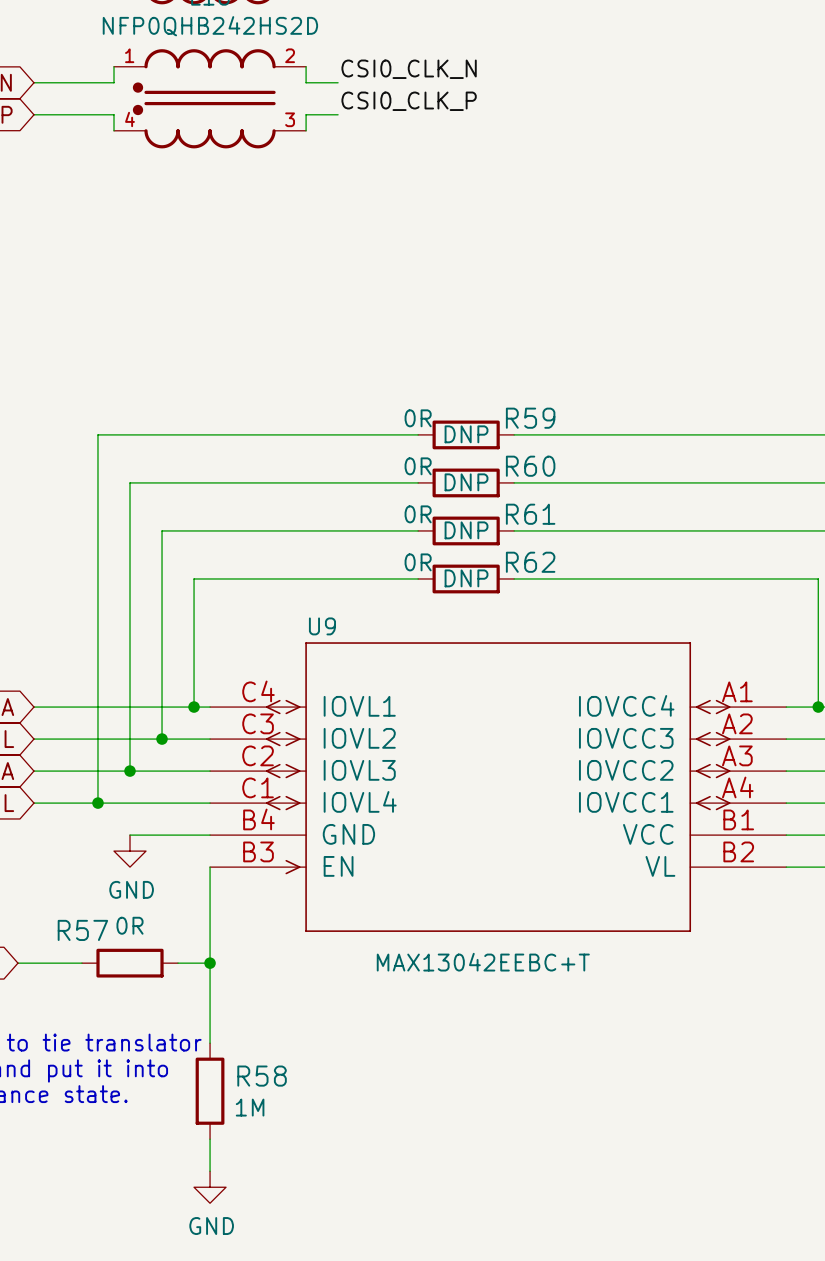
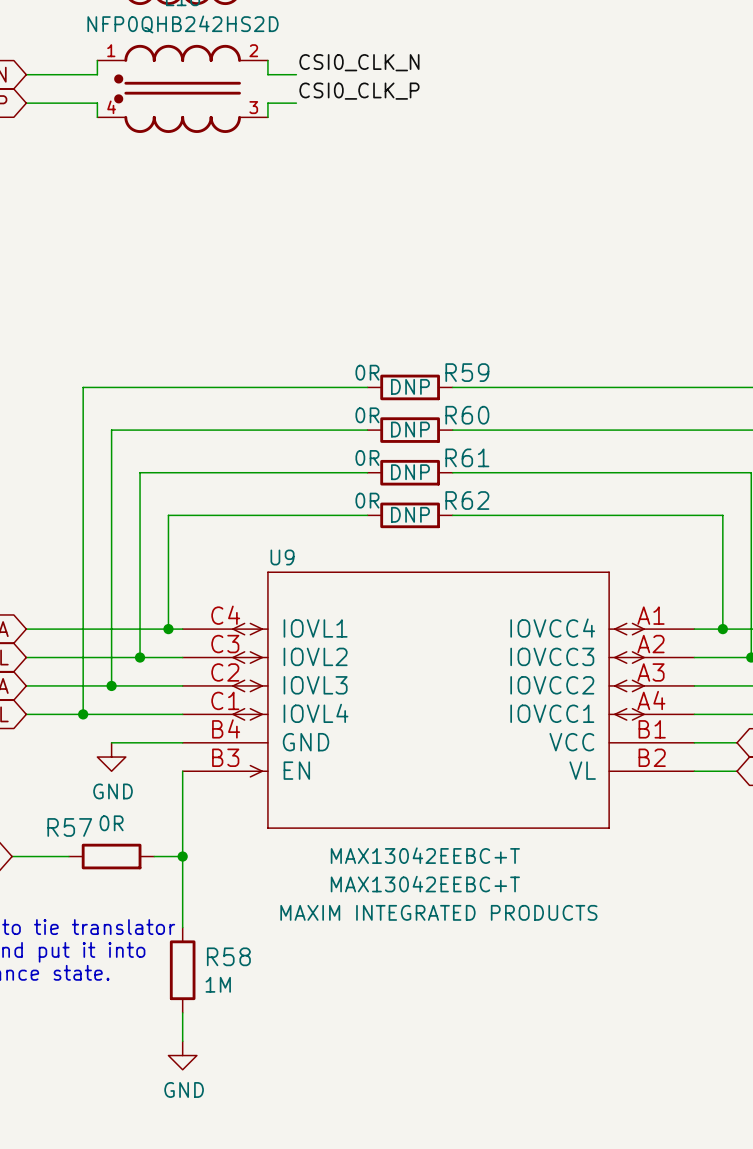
U9 text: none -> MAX13042EEBC+T (425, 884)
U9 text: none -> MAXIM INTEGRATED PRODUCTS (438, 912)

